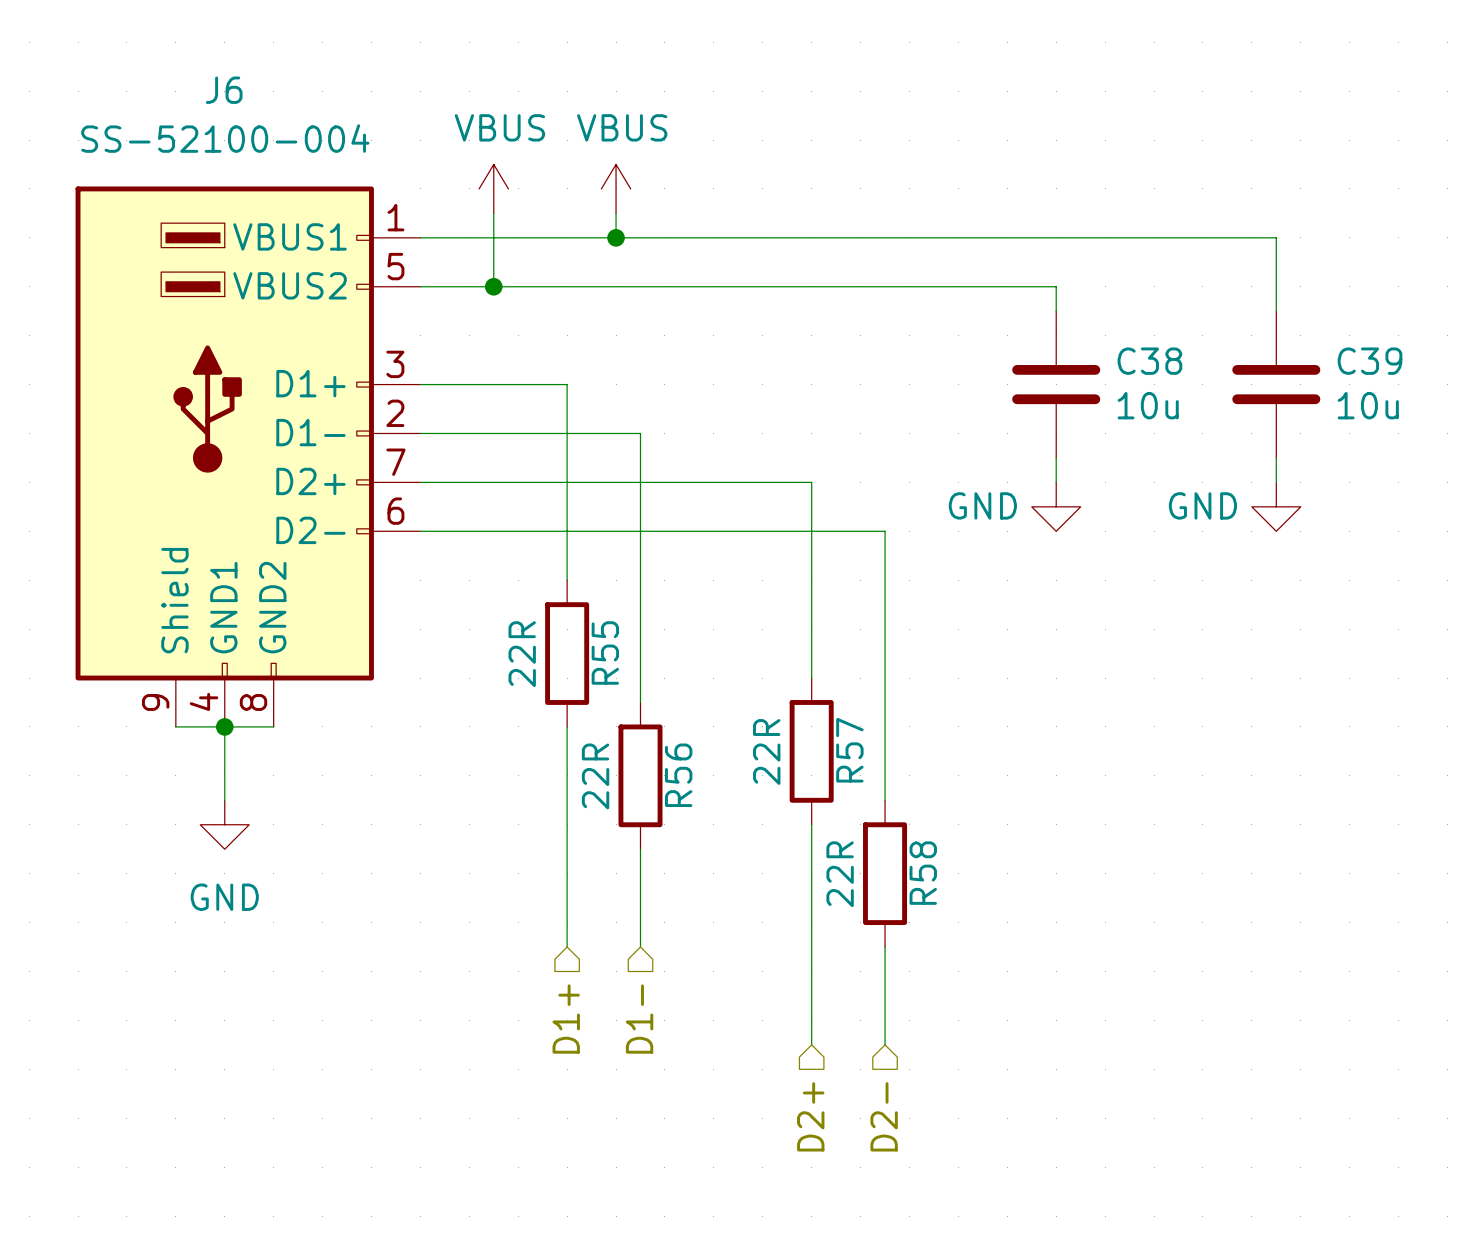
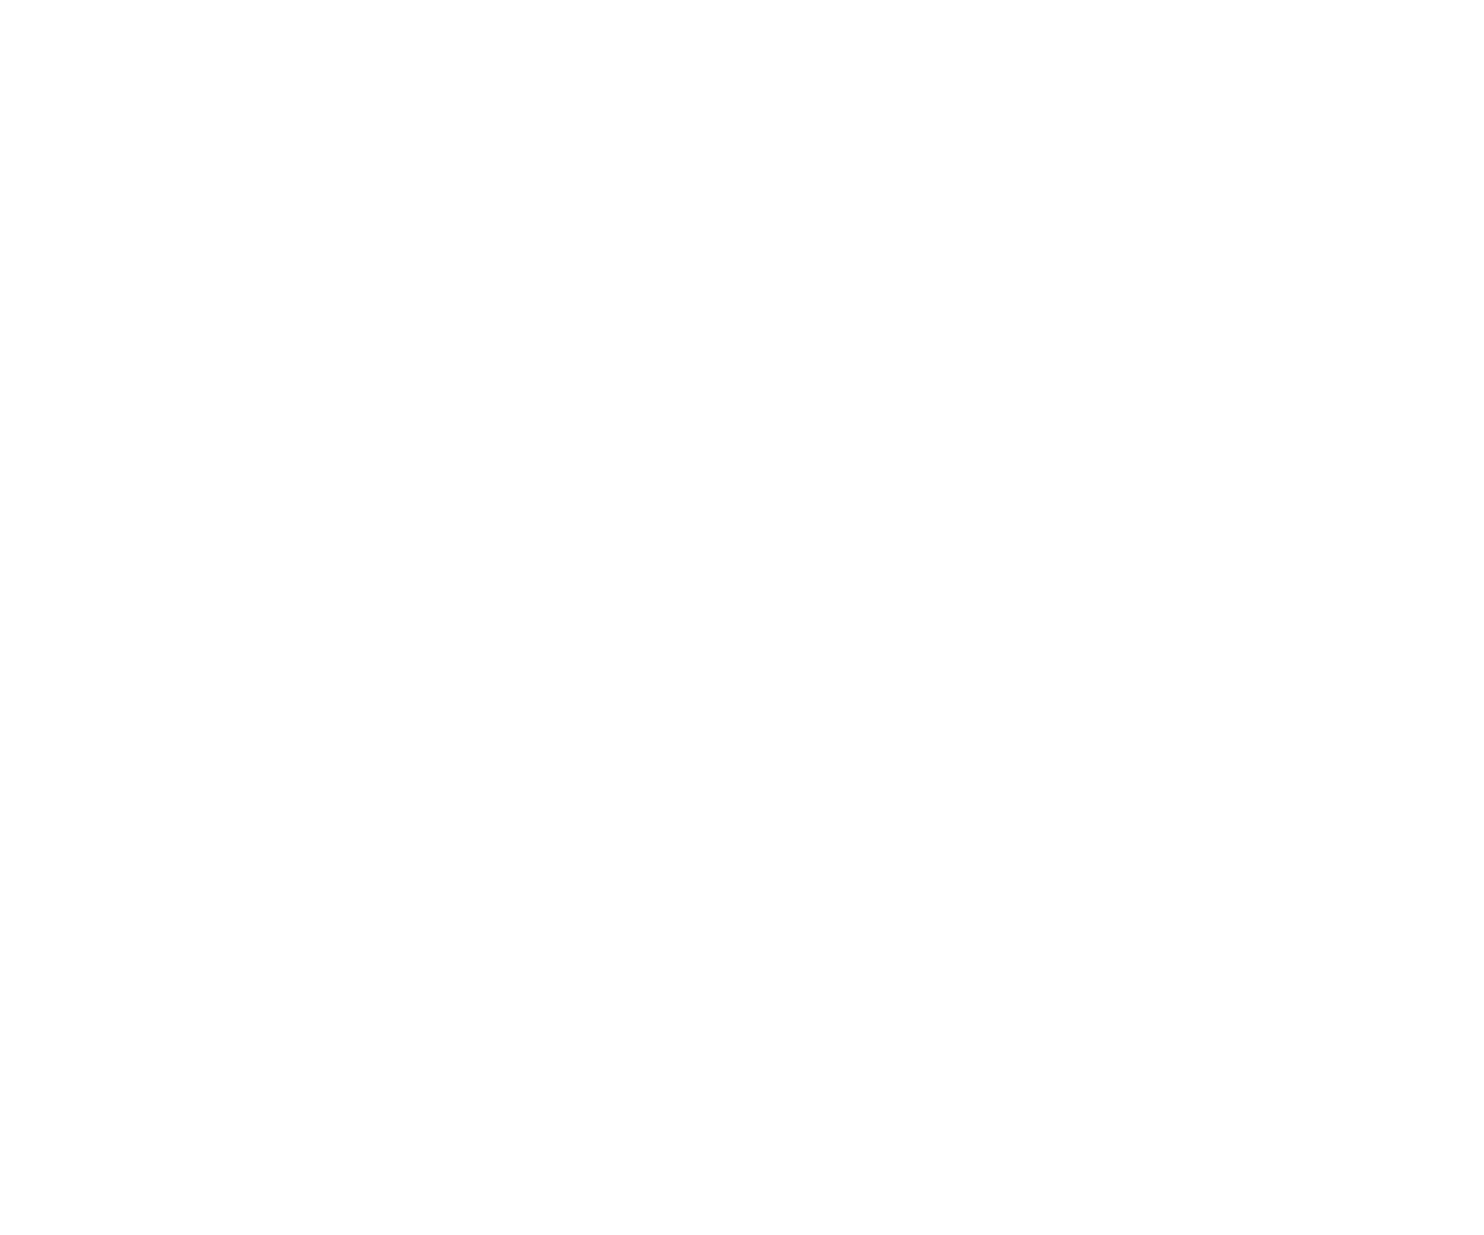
power symbol: VBUS (493, 188) -> none
power symbol: VBUS (616, 188) -> none
wire: (493, 213) (493, 286) -> none
wire: (616, 213) (616, 237) -> none
wire: (420, 237) (1276, 237) (1276, 311) -> none
junction: (616, 237) -> none
wire: (420, 286) (1056, 286) (1056, 311) -> none
junction: (493, 286) -> none
wire: (420, 384) (567, 384) (567, 580) -> none
C38: 10u (1056, 384) -> none
C39: 10u (1276, 384) -> none
wire: (420, 433) (640, 433) (640, 702) -> none
J6: SS-52100-004 (247, 456) -> none
wire: (1056, 457) (1056, 482) -> none
wire: (1276, 457) (1276, 482) -> none
wire: (420, 482) (811, 482) (811, 678) -> none
power symbol: GND (1056, 506) -> none
power symbol: GND (1276, 506) -> none
wire: (420, 531) (885, 531) (885, 800) -> none
R55: 22R (567, 653) -> none
wire: (175, 726) (273, 726) -> none
wire: (224, 726) (224, 800) -> none
junction: (224, 726) -> none
wire: (567, 726) (567, 947) -> none
R57: 22R (811, 751) -> none
R56: 22R (640, 775) -> none
power symbol: GND (224, 824) -> none
wire: (811, 824) (811, 1044) -> none
wire: (640, 849) (640, 947) -> none
R58: 22R (885, 873) -> none
wire: (885, 947) (885, 1044) -> none
hierarchical label: D1+ (566, 1019) -> none
hierarchical label: D1- (639, 1019) -> none
hierarchical label: D2+ (810, 1116) -> none
hierarchical label: D2- (884, 1116) -> none

